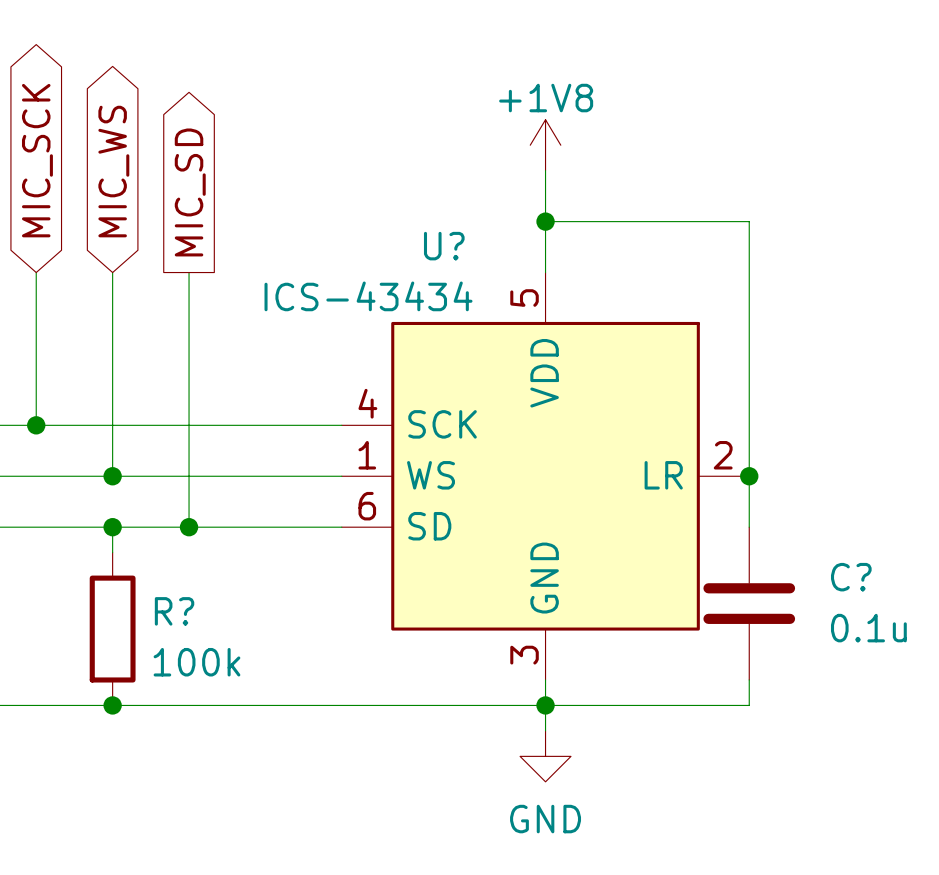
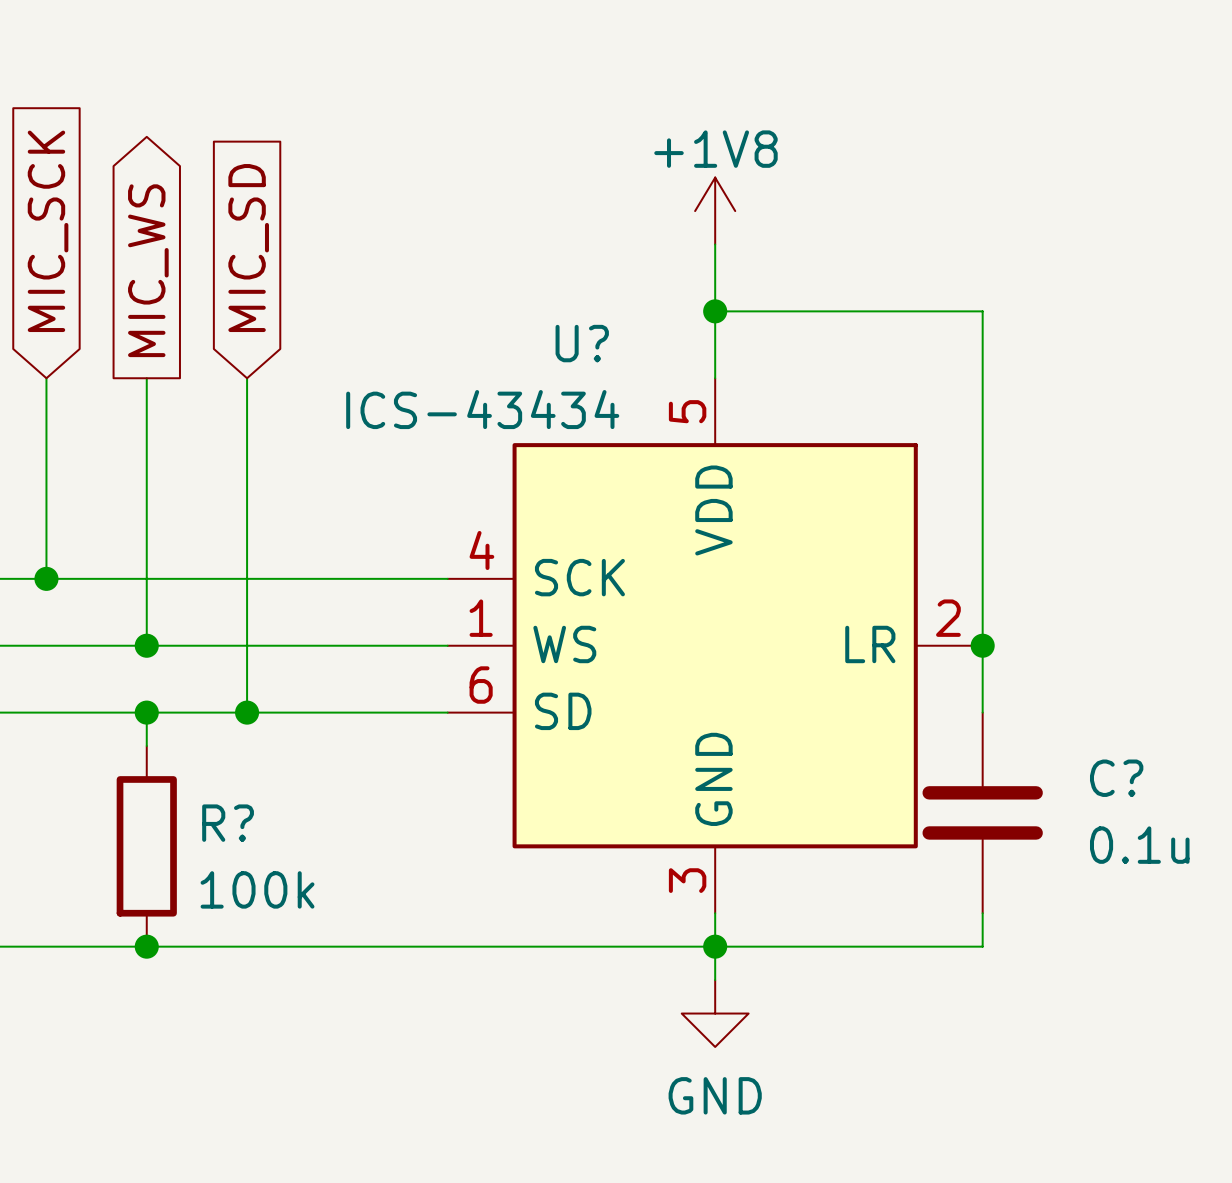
global label shape: bidirectional (37, 160) -> input (48, 231)
global label shape: bidirectional (113, 171) -> output (148, 270)
global label shape: output (190, 192) -> input (248, 248)

